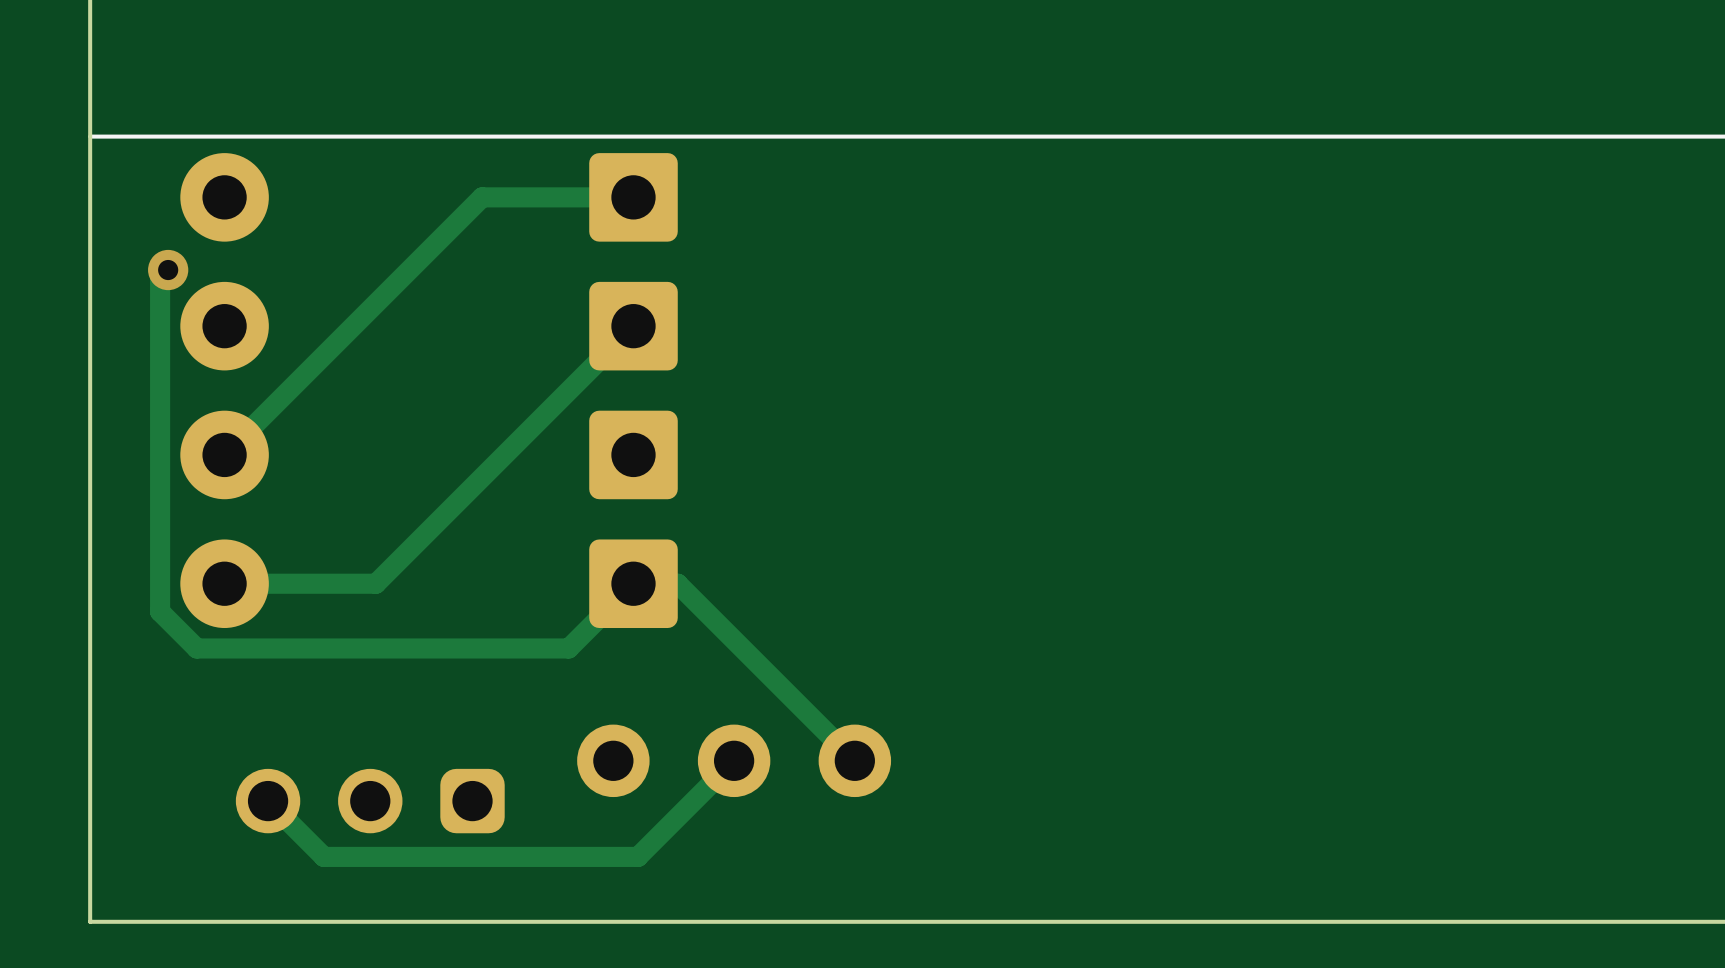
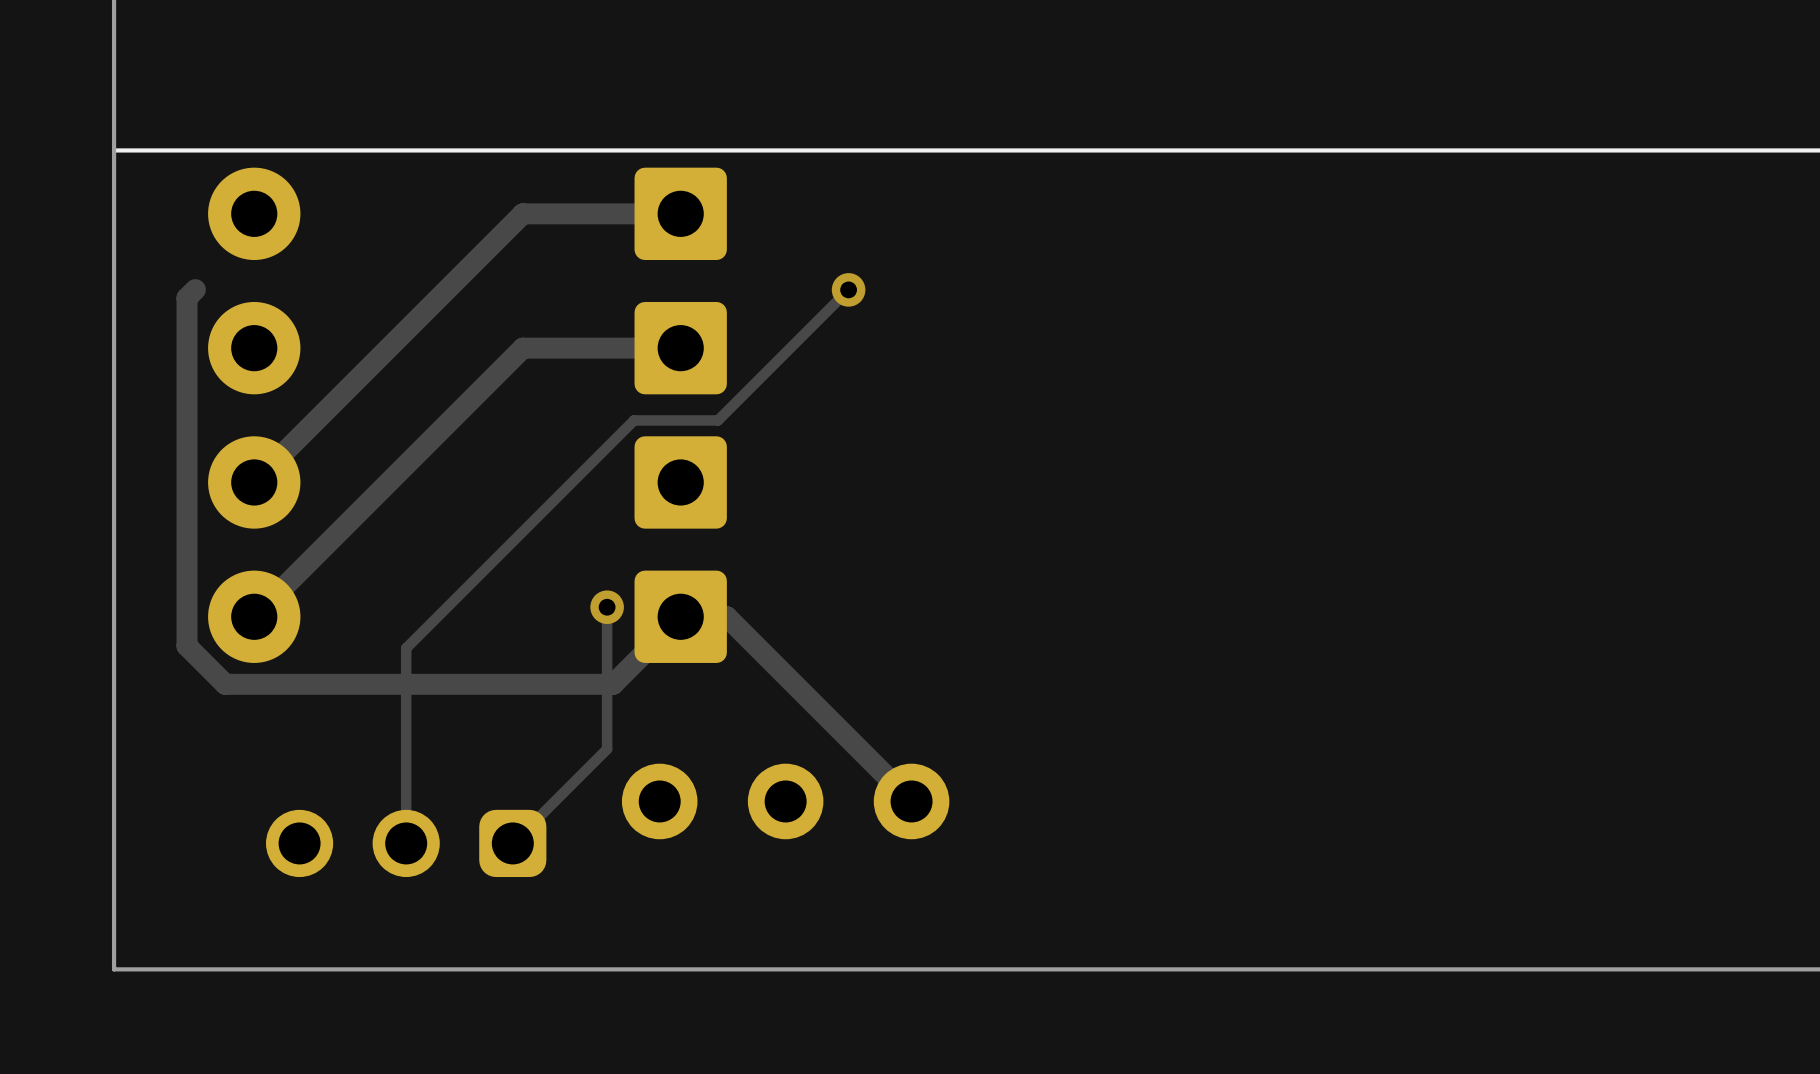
via: (168, 270) -> none
track: none -> (848, 289) (718, 420) (634, 420) (406, 648) (406, 843)
via: none -> (848, 289)
track: (633, 326) (375, 583) (224, 583) -> (680, 348) (522, 348) (254, 616)
track: none -> (607, 607) (607, 749) (512, 843)
via: none -> (607, 607)
track: (734, 760) (638, 856) (323, 856) (268, 801) -> none

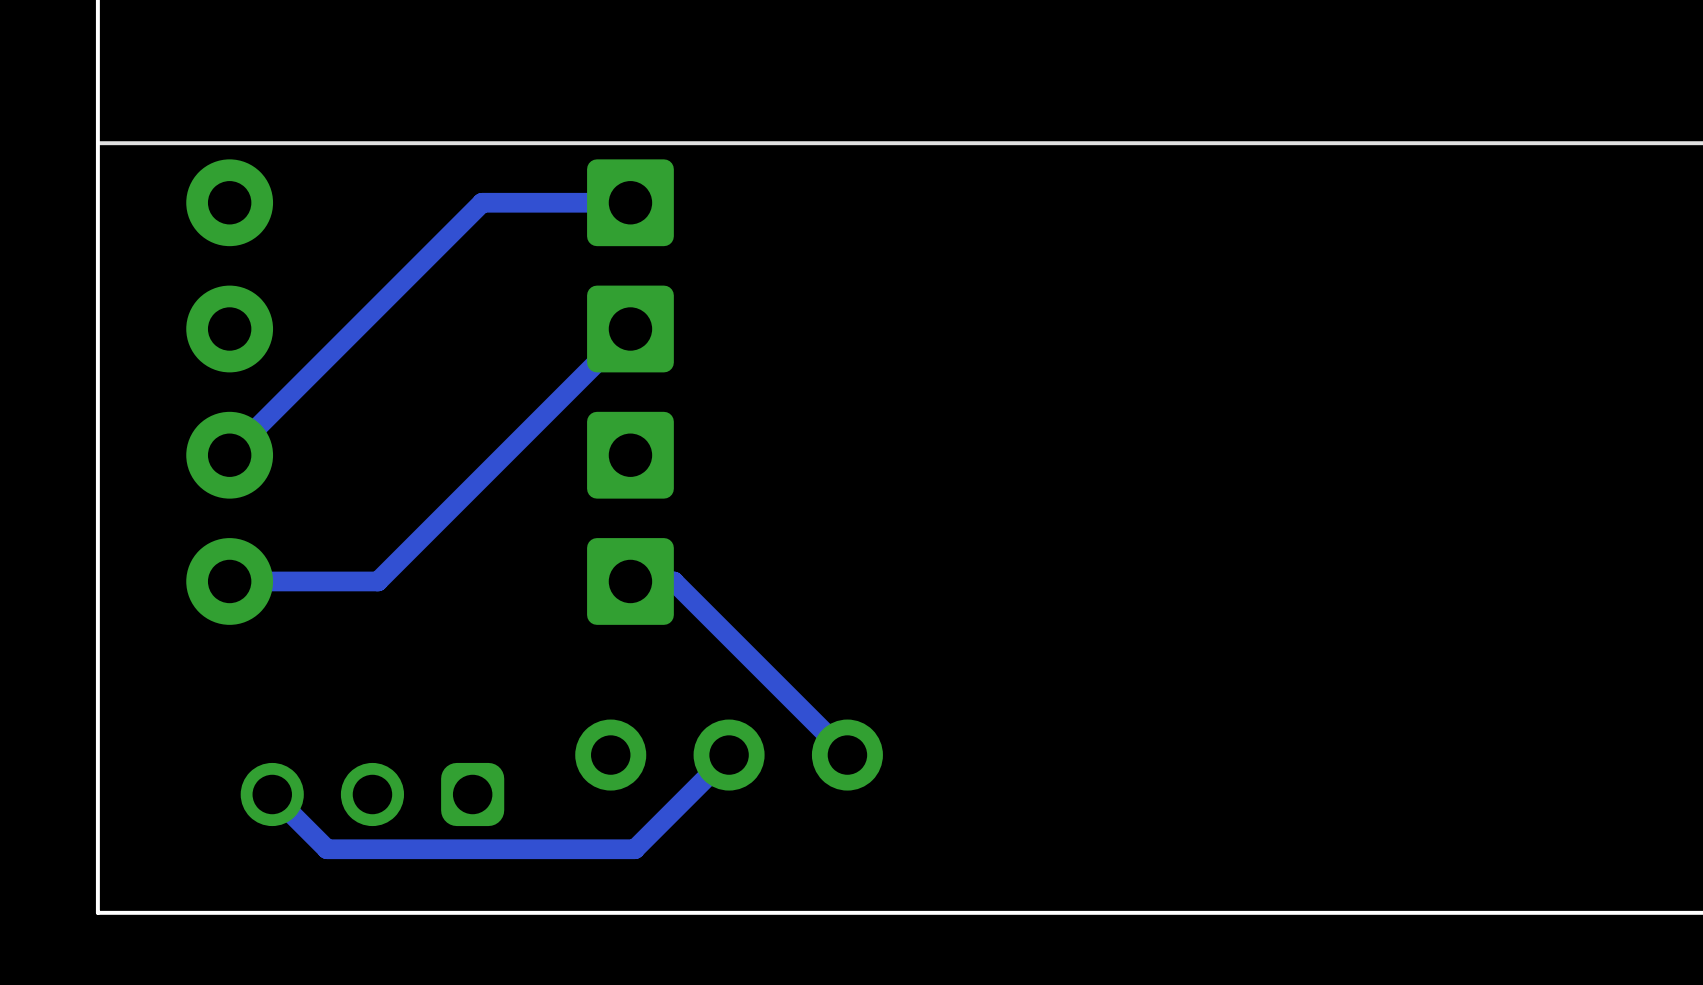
track: (195, 289) (187, 298) (187, 645) (225, 684) (613, 684) (680, 616) -> none
track: (848, 289) (718, 420) (634, 420) (406, 648) (406, 843) -> none
via: (848, 289) -> none
track: (680, 348) (522, 348) (254, 616) -> (630, 328) (377, 581) (229, 581)
track: (607, 607) (607, 749) (512, 843) -> none
via: (607, 607) -> none
track: none -> (729, 755) (634, 849) (327, 849) (272, 794)

